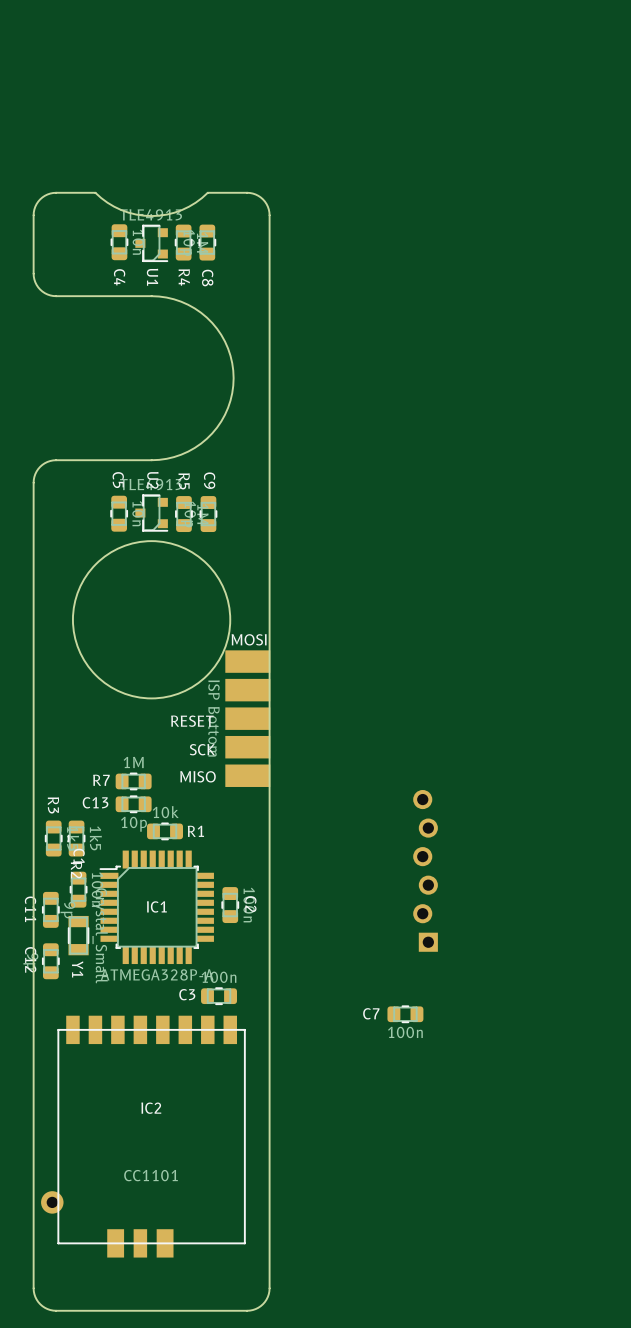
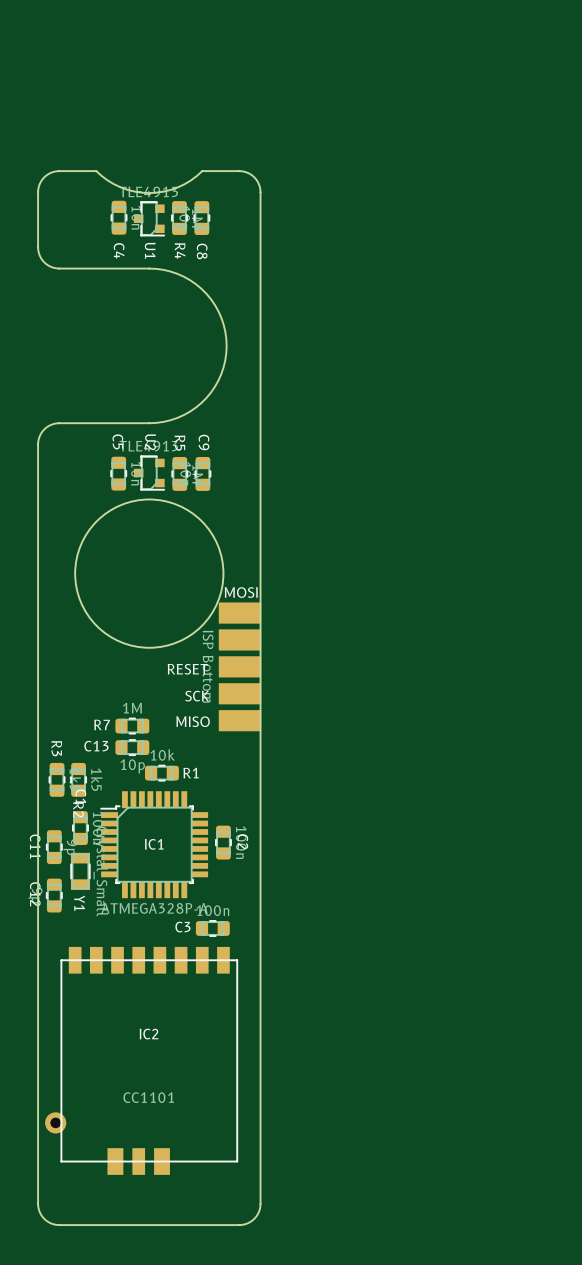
part: (425, 870) -> none
C7: 100n (405, 1014) -> none

